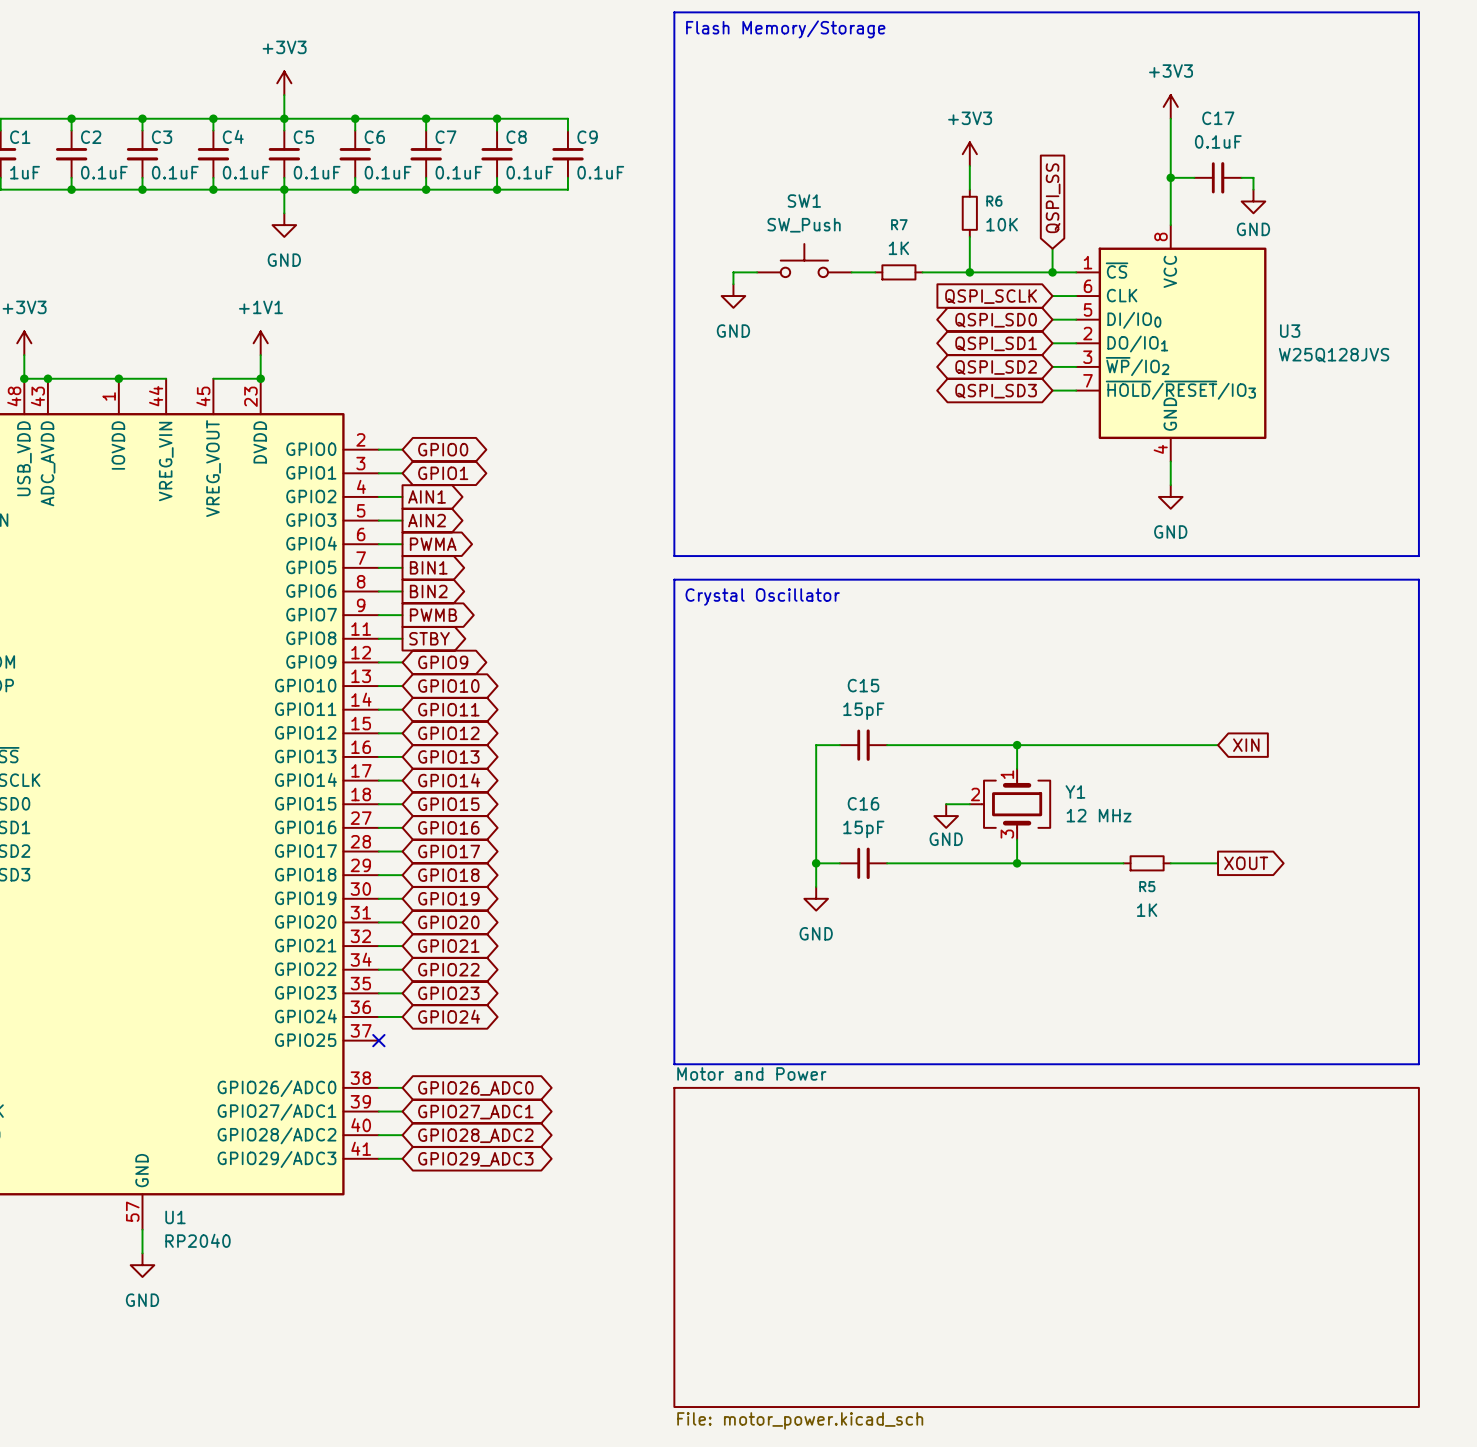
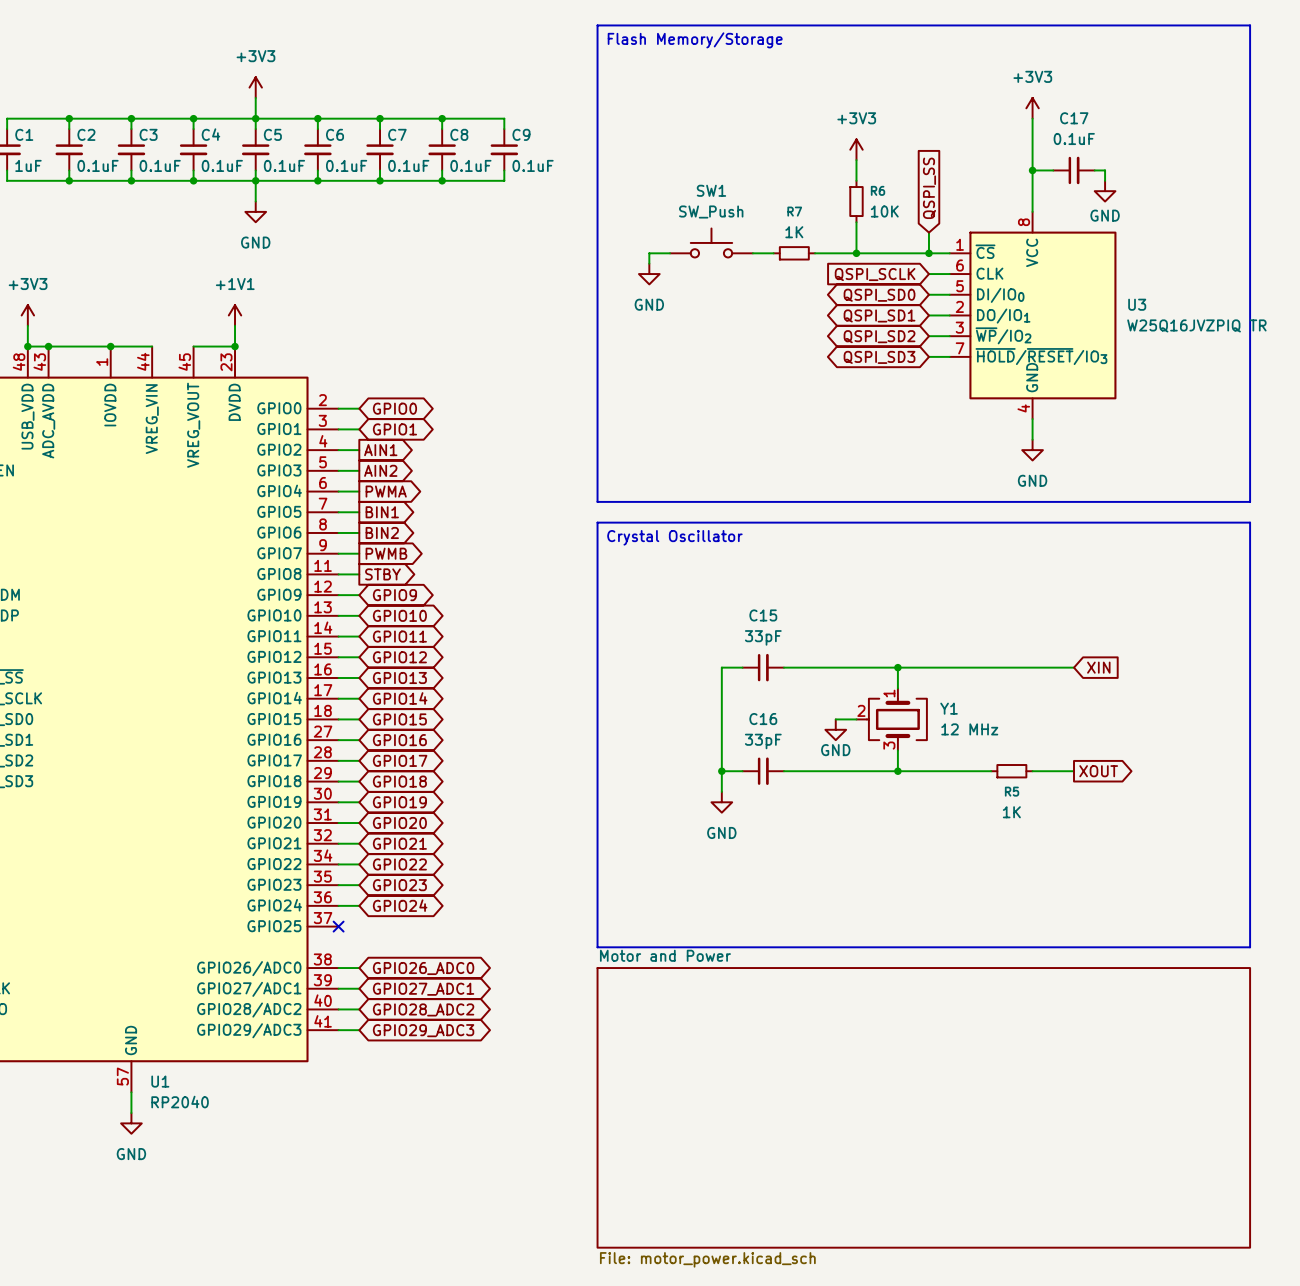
U3 value: W25Q128JVS (1334, 355) -> W25Q16JVZPIQ TR (1196, 325)
C15 value: 15pF (863, 711) -> 33pF (763, 637)
C16 value: 15pF (863, 829) -> 33pF (763, 741)

